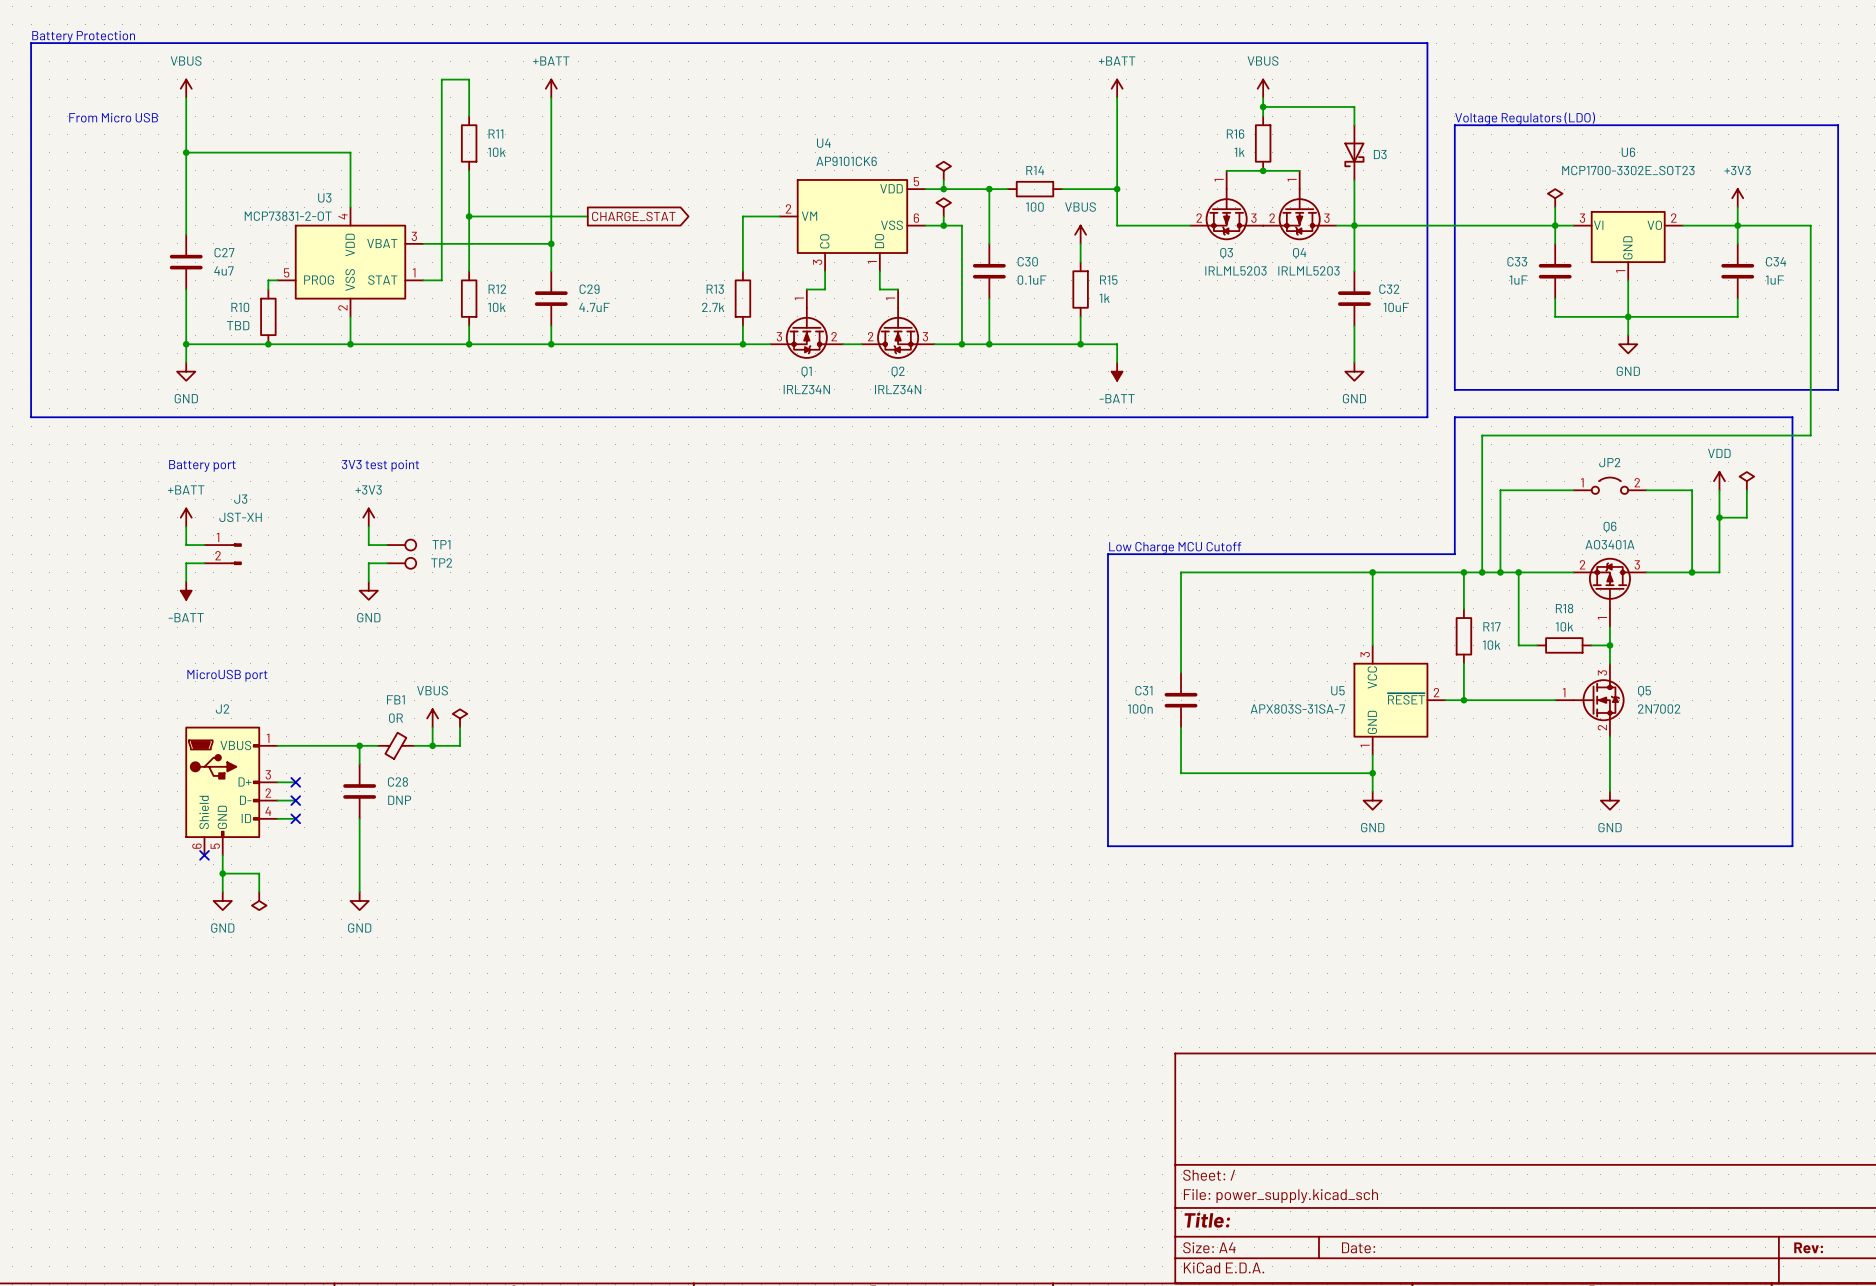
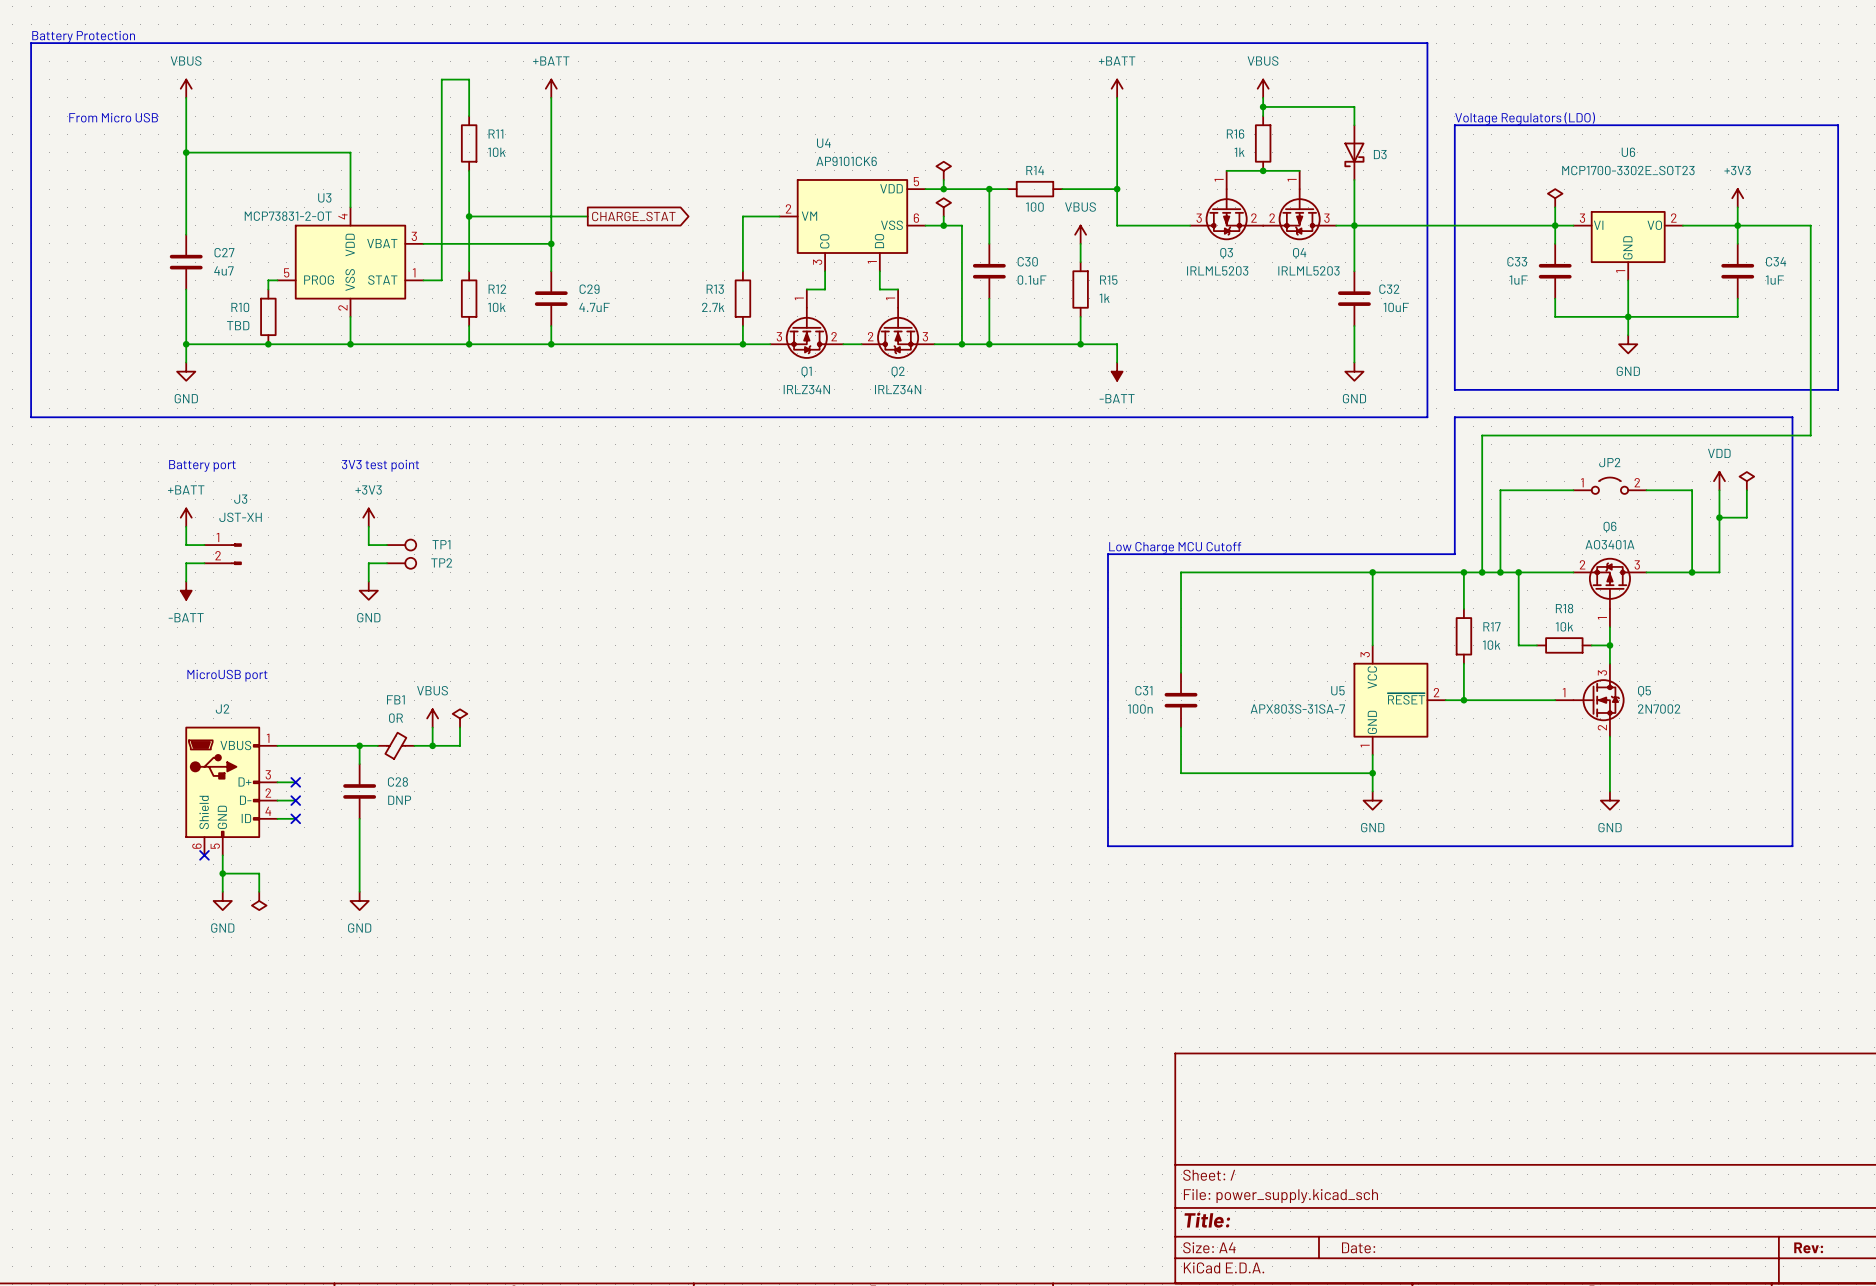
Q3 flip: as is (1226, 214) -> left-right (1226, 214)

